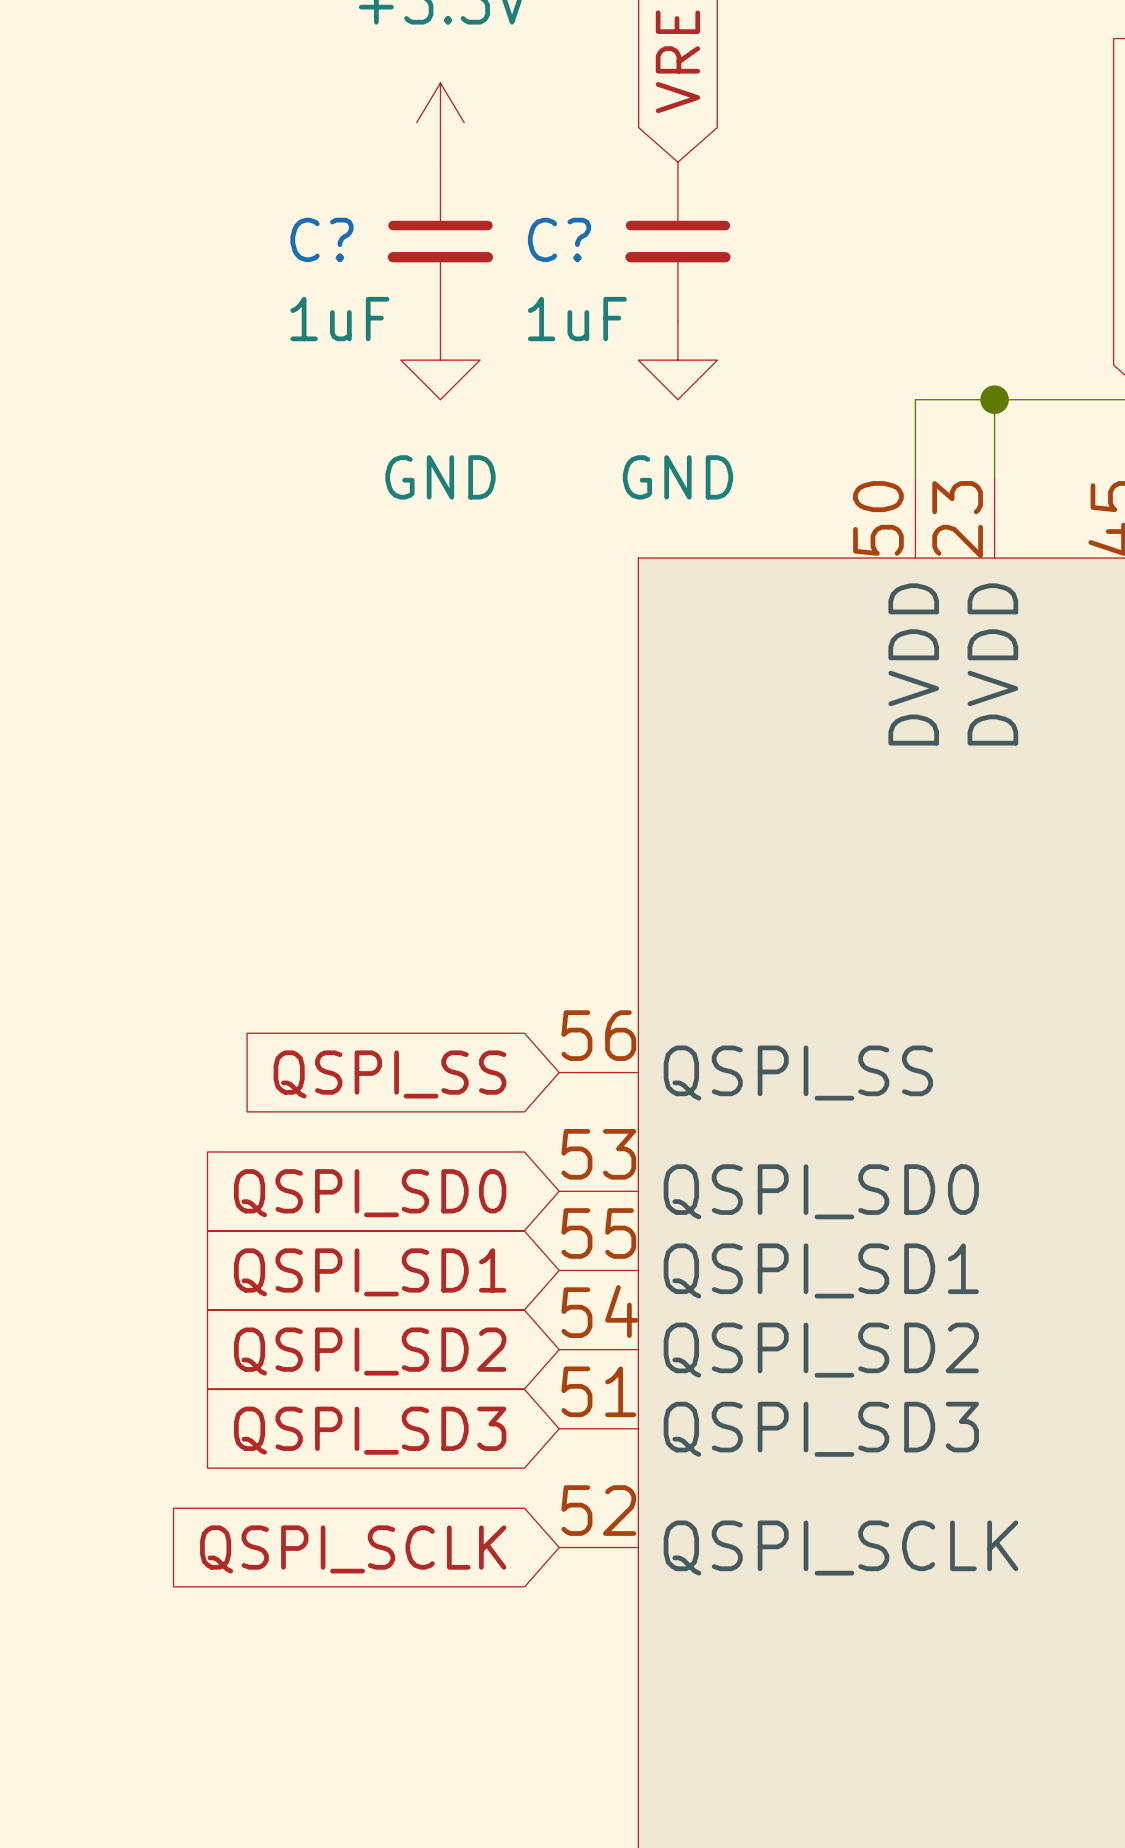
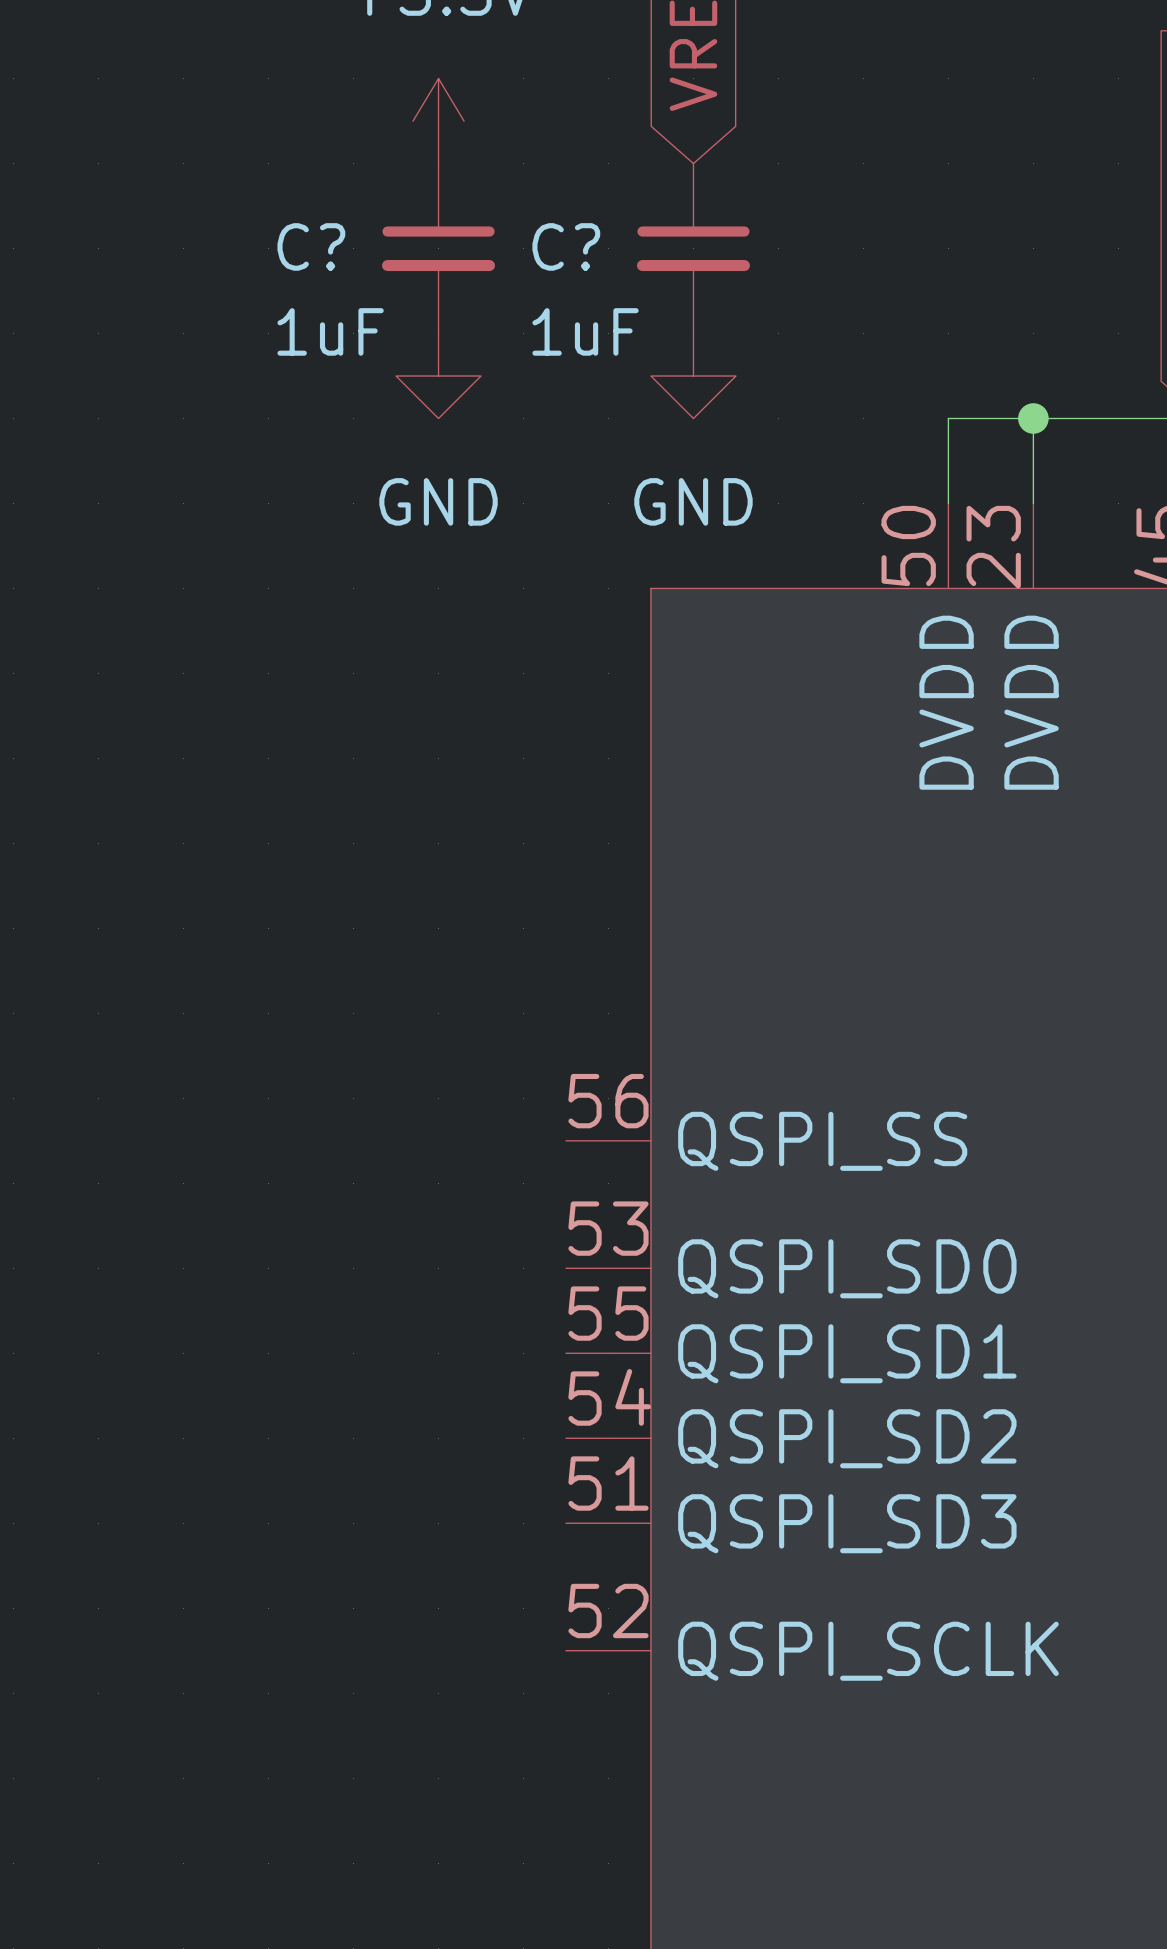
global label: QSPI_SS (389, 1074) -> none
global label: QSPI_SD0 (370, 1193) -> none
global label: QSPI_SD1 (370, 1272) -> none
global label: QSPI_SD2 (370, 1351) -> none
global label: QSPI_SD3 (370, 1430) -> none
global label: QSPI_SCLK (353, 1549) -> none

